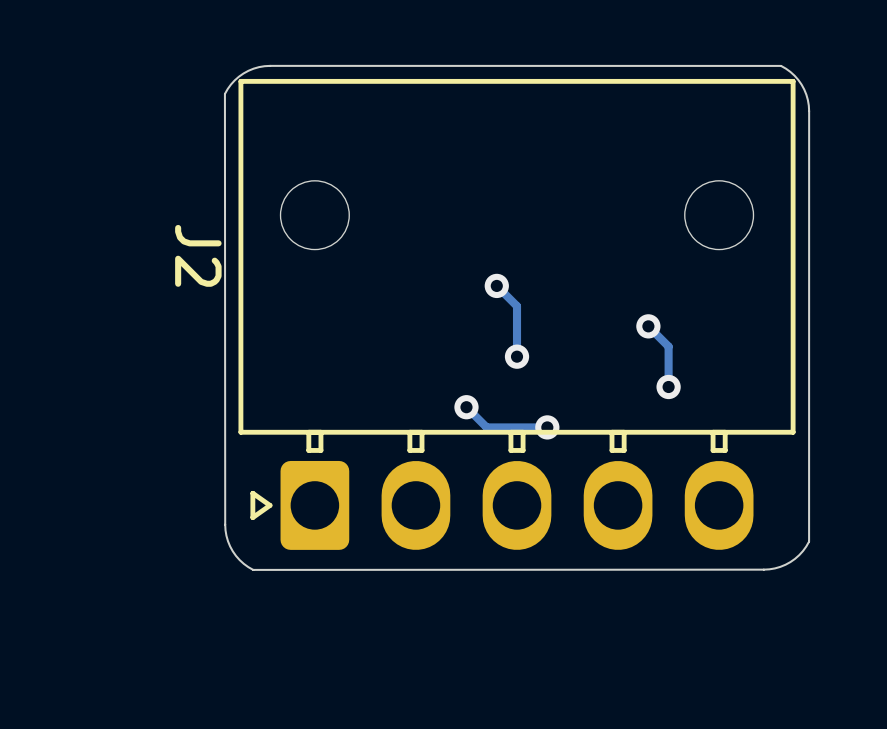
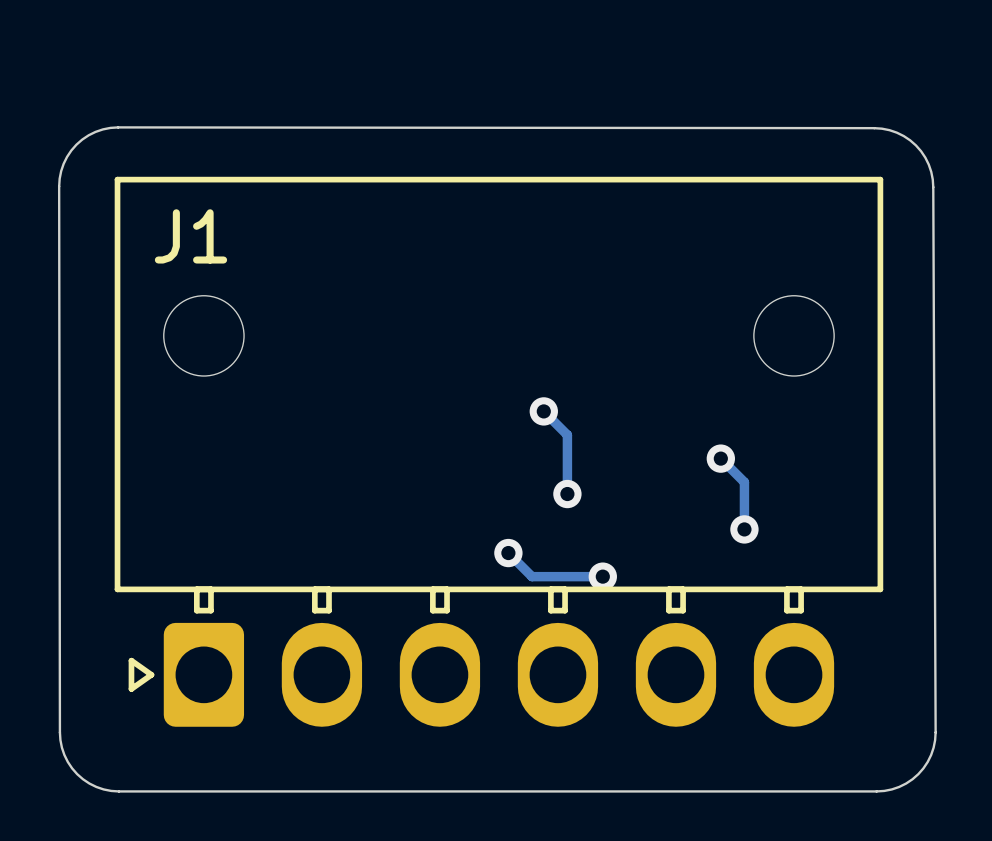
board edge: none -> (118, 127) (874, 128) (889, 130) (910, 140) (921, 151) (928, 164) (933, 187) (935, 732) (931, 755) (923, 768) (906, 783) (891, 789) (876, 791) (118, 791) (96, 786) (83, 779) (67, 761) (61, 747) (59, 732) (59, 186) (63, 163) (76, 144) (95, 131) (118, 127)
J2: (517, 314) -> none
J1: none -> (498, 451)
board edge: (809, 541) (809, 111) (804, 89) (790, 71) (781, 65) (270, 65) (259, 67) (243, 73) (231, 84) (224, 93) (225, 530) (232, 551) (239, 560) (253, 569) -> none
board edge: (809, 541) (803, 551) (790, 562) (774, 568) (763, 569) (253, 569) -> none

